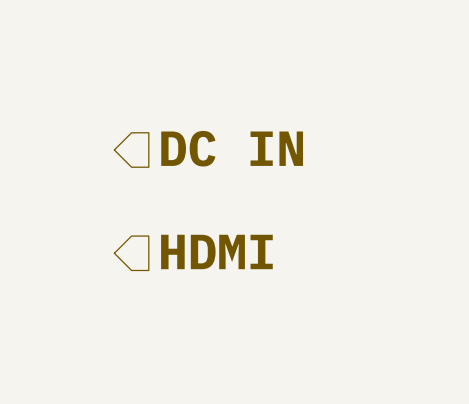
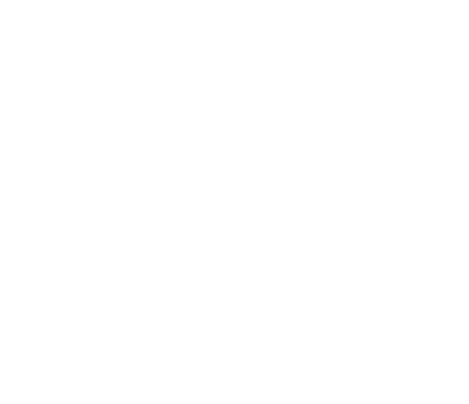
hierarchical label: DC IN (232, 148) -> none
hierarchical label: HDMI (216, 251) -> none

